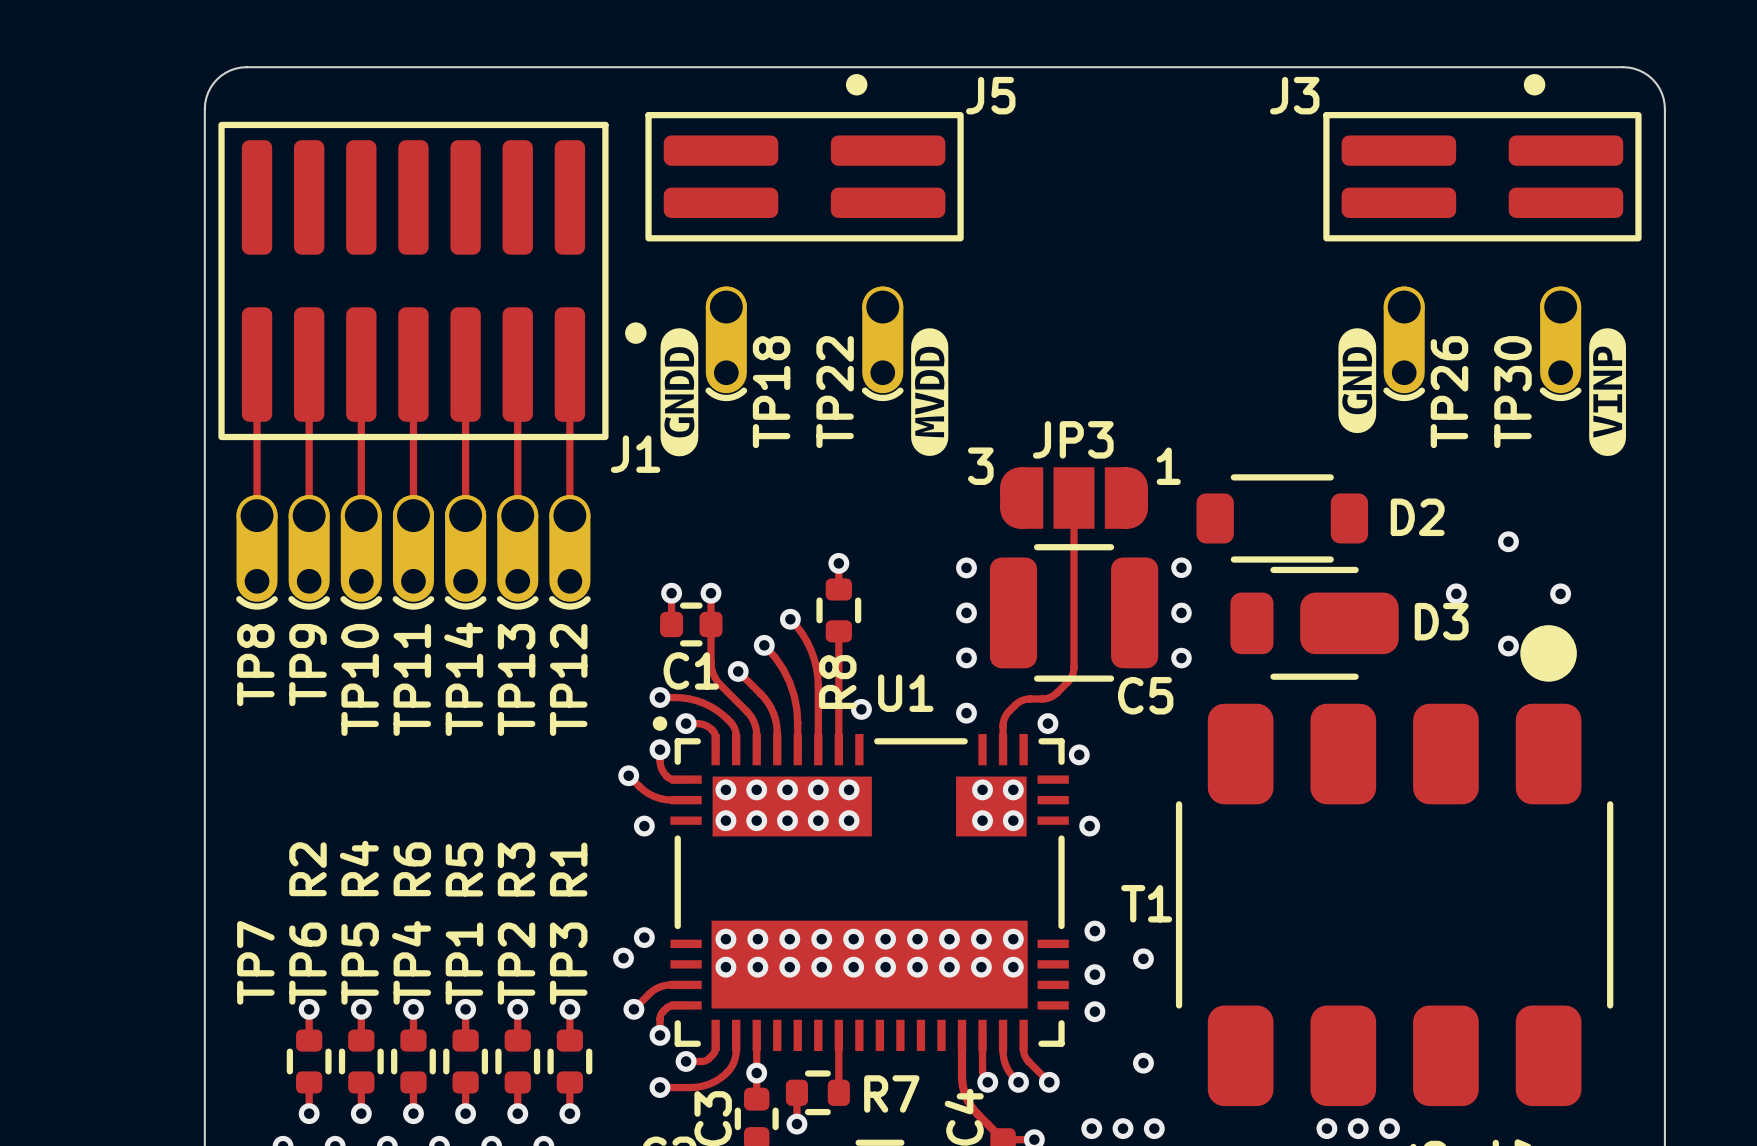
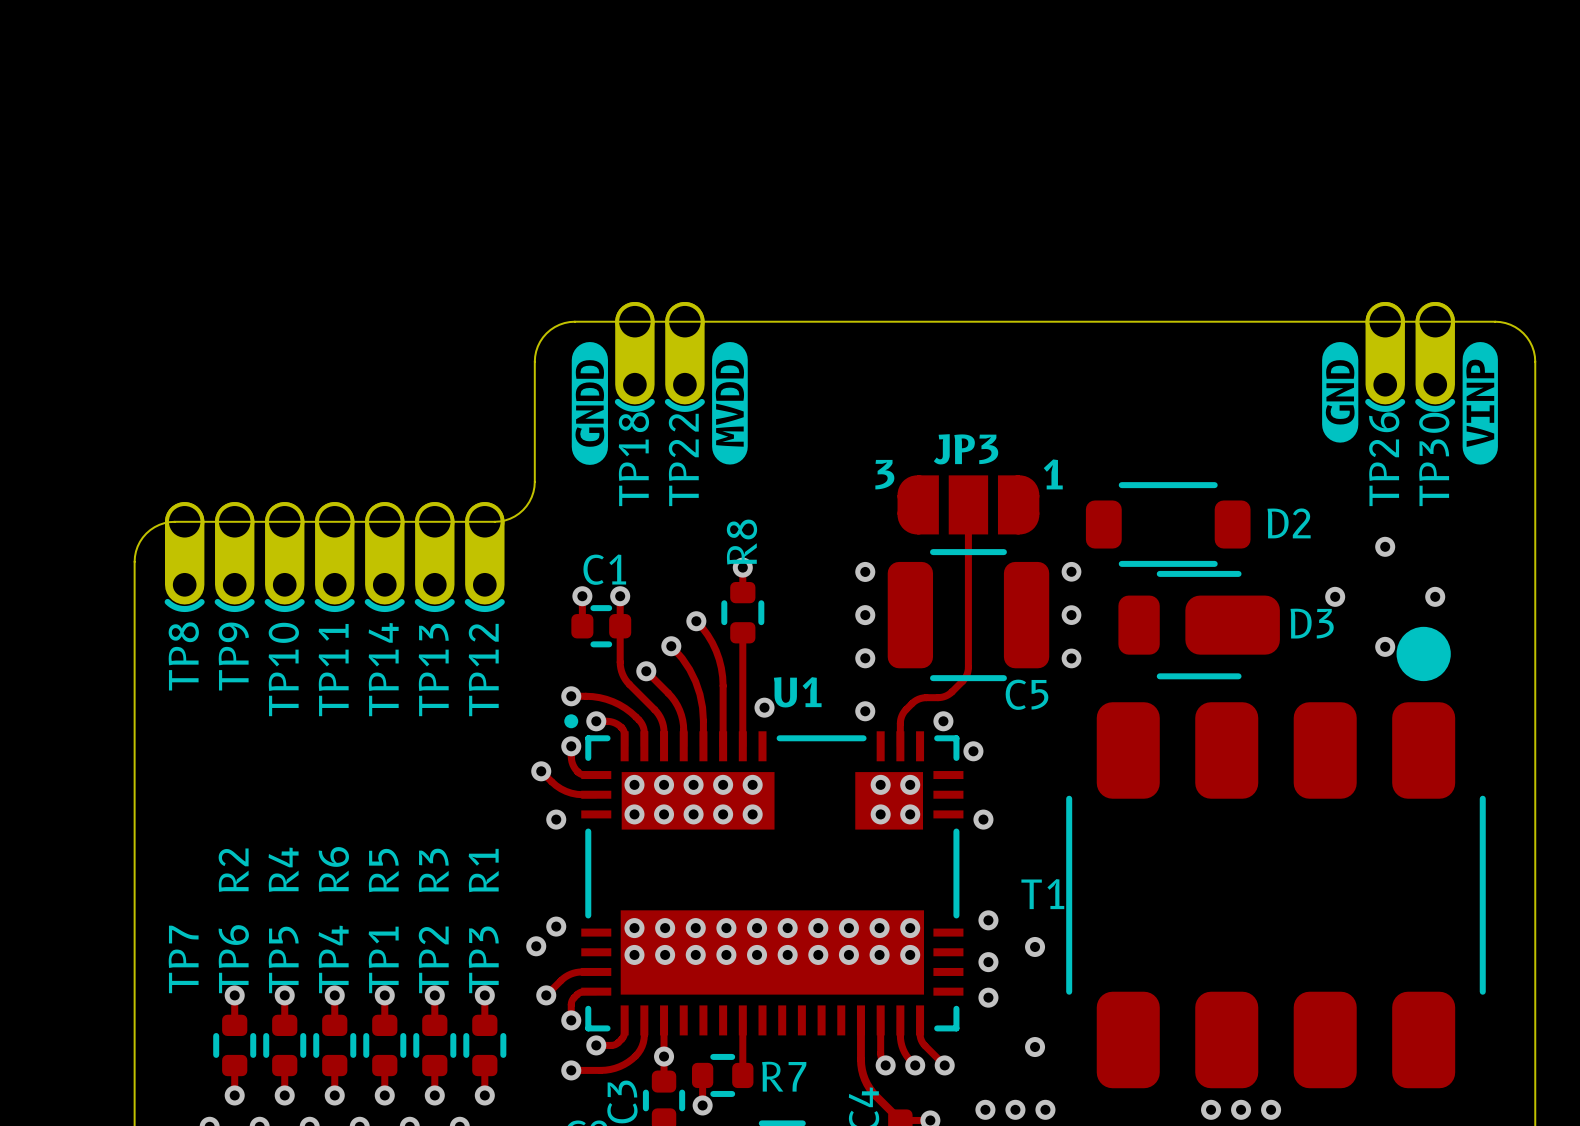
J5: (804, 157) -> none
J3: (1482, 157) -> none
J1: (432, 280) -> none
TP22 position: (882, 343) -> (684, 356)
TP26 position: (1404, 343) -> (1385, 356)
board edge: (1664, 348) (1664, 103) (1659, 88) (1652, 79) (1644, 72) (1628, 67) (241, 67) (225, 72) (217, 79) (210, 88) (205, 103) (204, 557) -> (1535, 361) (1532, 346) (1523, 333) (1510, 324) (1495, 321) (569, 322) (554, 327) (546, 333) (536, 351) (534, 487) (526, 506) (514, 516) (494, 521) (169, 522) (159, 524) (146, 533) (137, 546) (134, 561)
track: (257, 364) (257, 515) -> none
track: (309, 364) (309, 515) -> none
track: (361, 364) (361, 515) -> none
track: (413, 364) (413, 515) -> none
track: (465, 364) (465, 515) -> none
track: (517, 364) (517, 515) -> none
track: (569, 364) (569, 515) -> none
drawing position: (1357, 380) -> (1340, 392)
TP18 name position: TP18 (771, 392) -> TP18 (633, 459)
TP22 name position: TP22 (835, 392) -> TP22 (683, 459)
drawing position: (929, 392) -> (729, 403)
TP26 name position: TP26 (1449, 392) -> TP26 (1384, 459)
TP30 name position: TP30 (1512, 392) -> TP30 (1434, 459)
C1 name position: C1 (691, 670) -> C1 (604, 569)
R8 name position: R8 (837, 682) -> R8 (741, 542)

